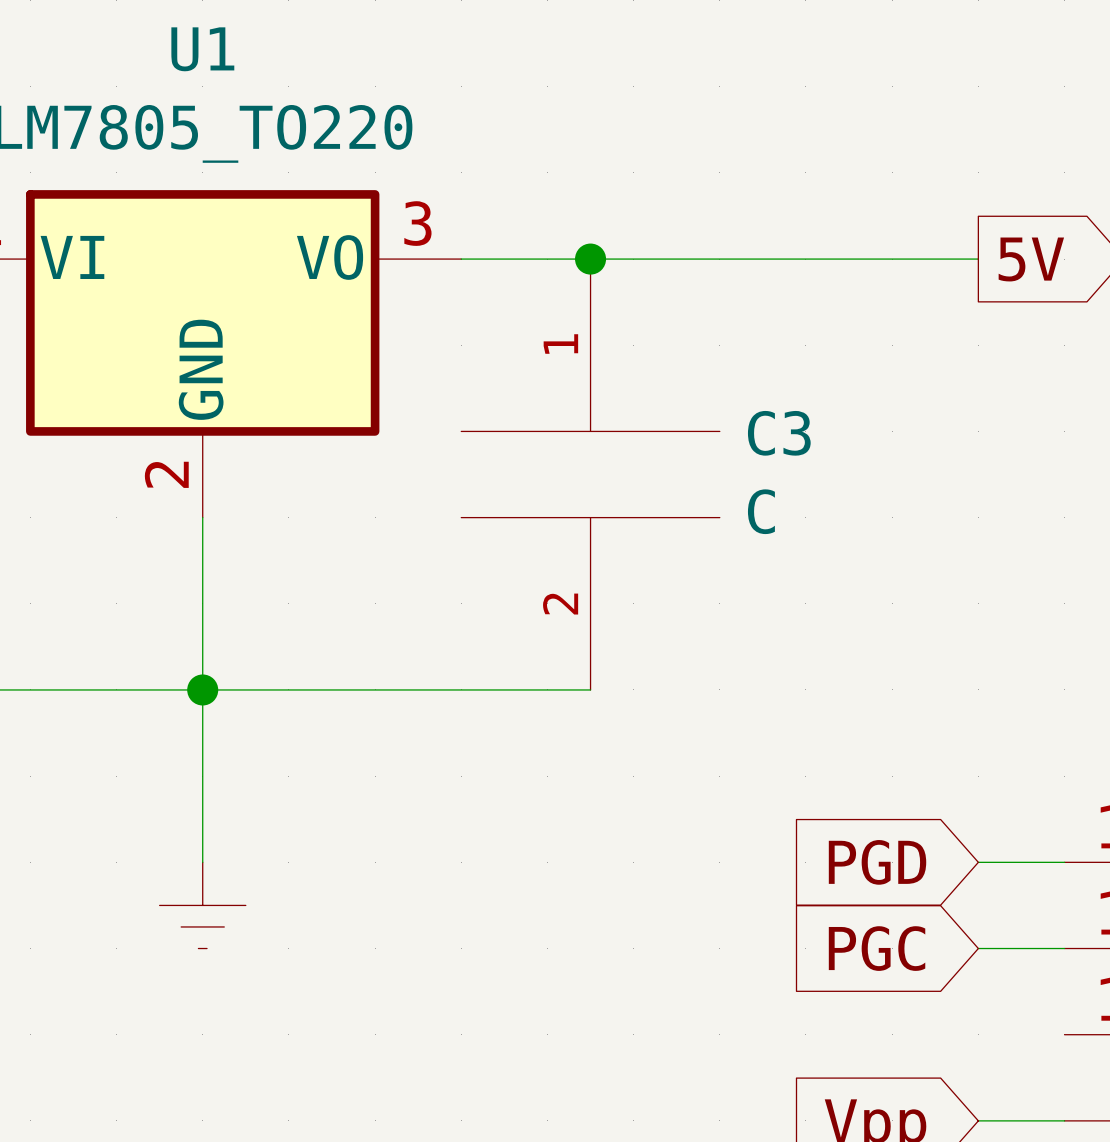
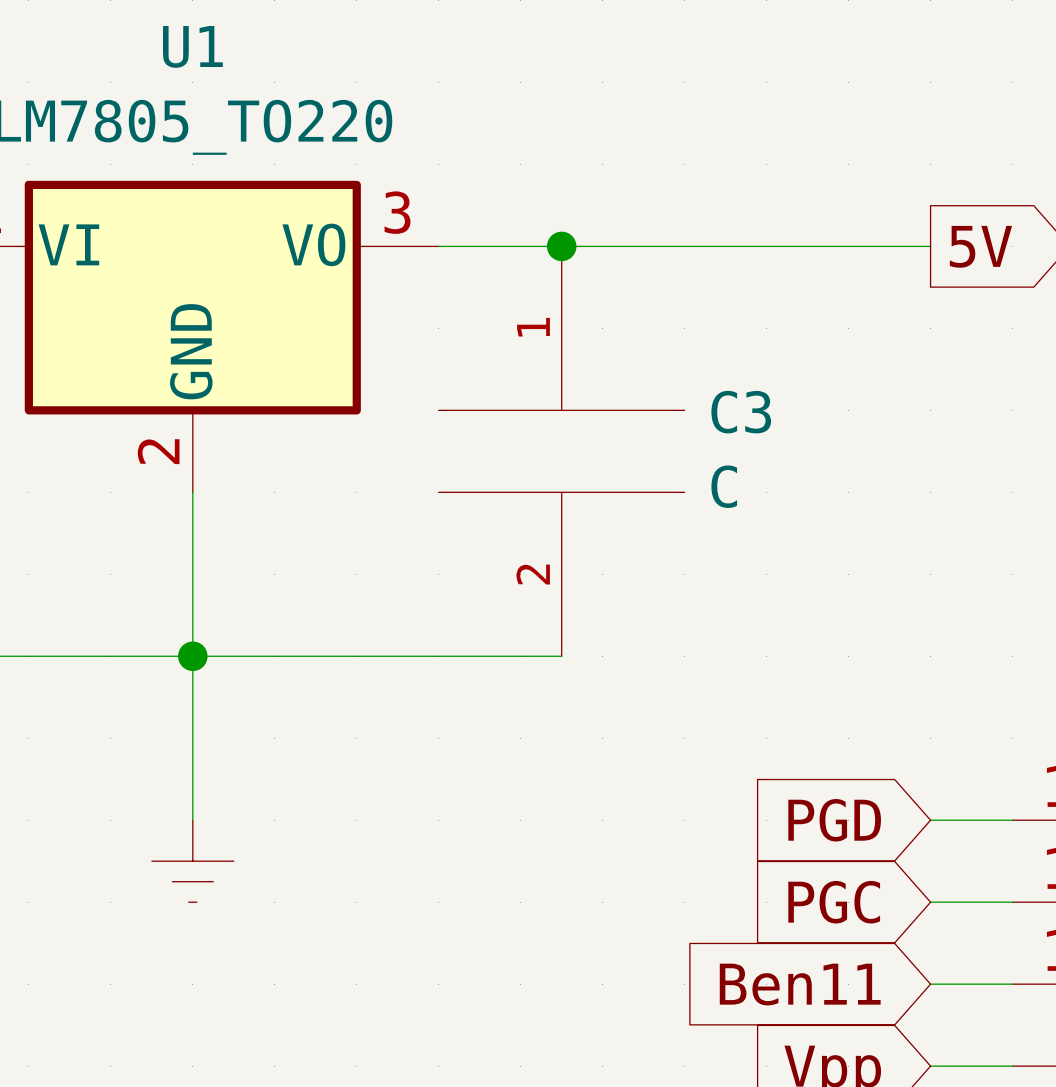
wire: none -> (930, 984) (1012, 984)
global label: none -> Ben11 (800, 984)

